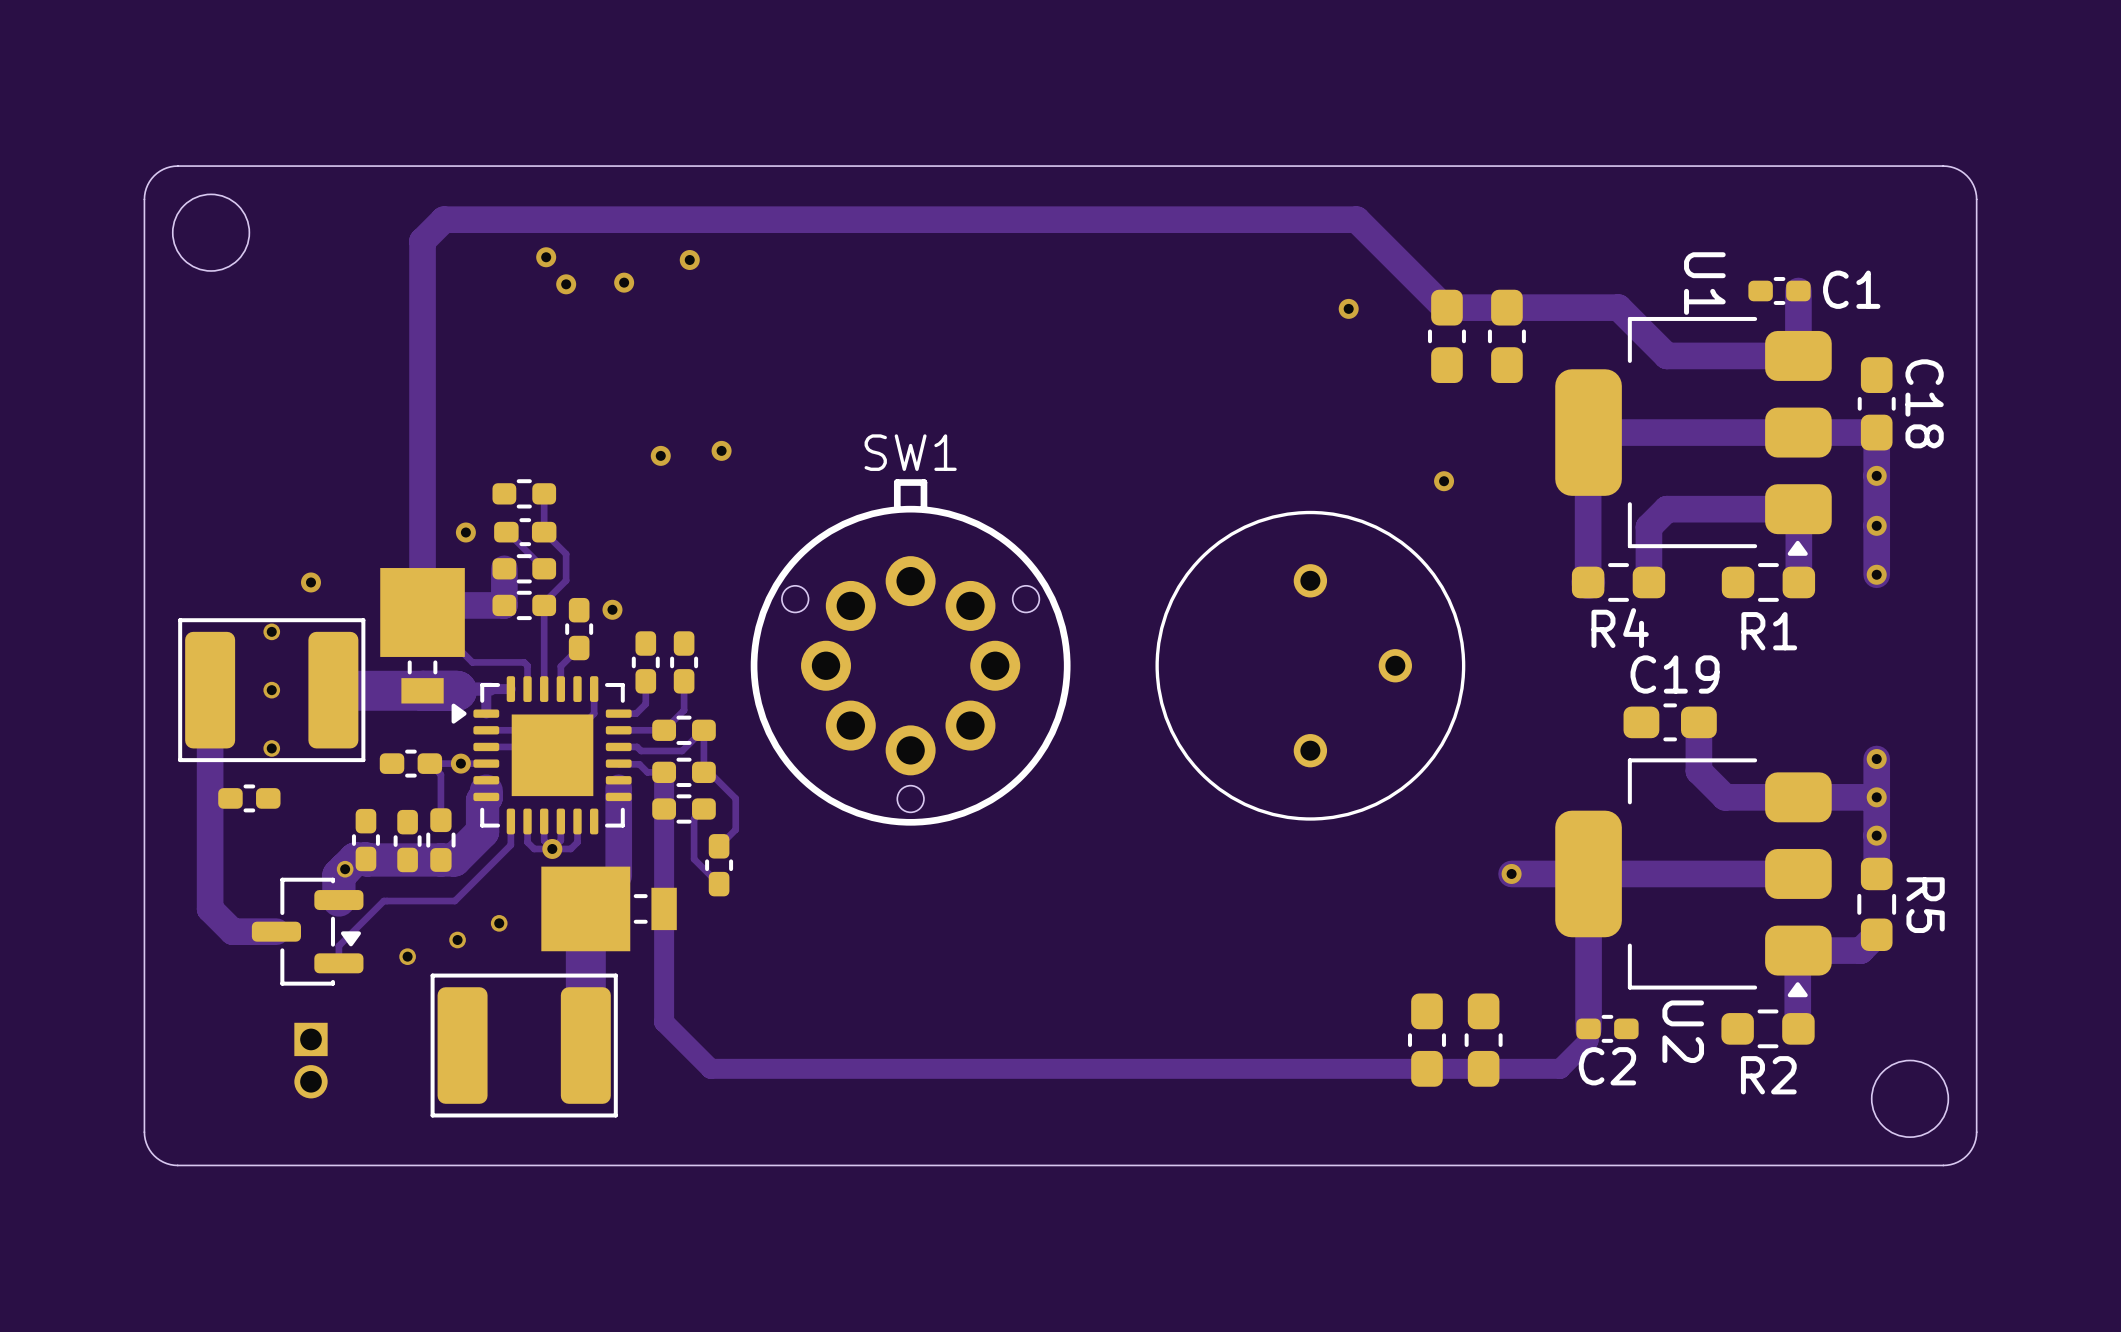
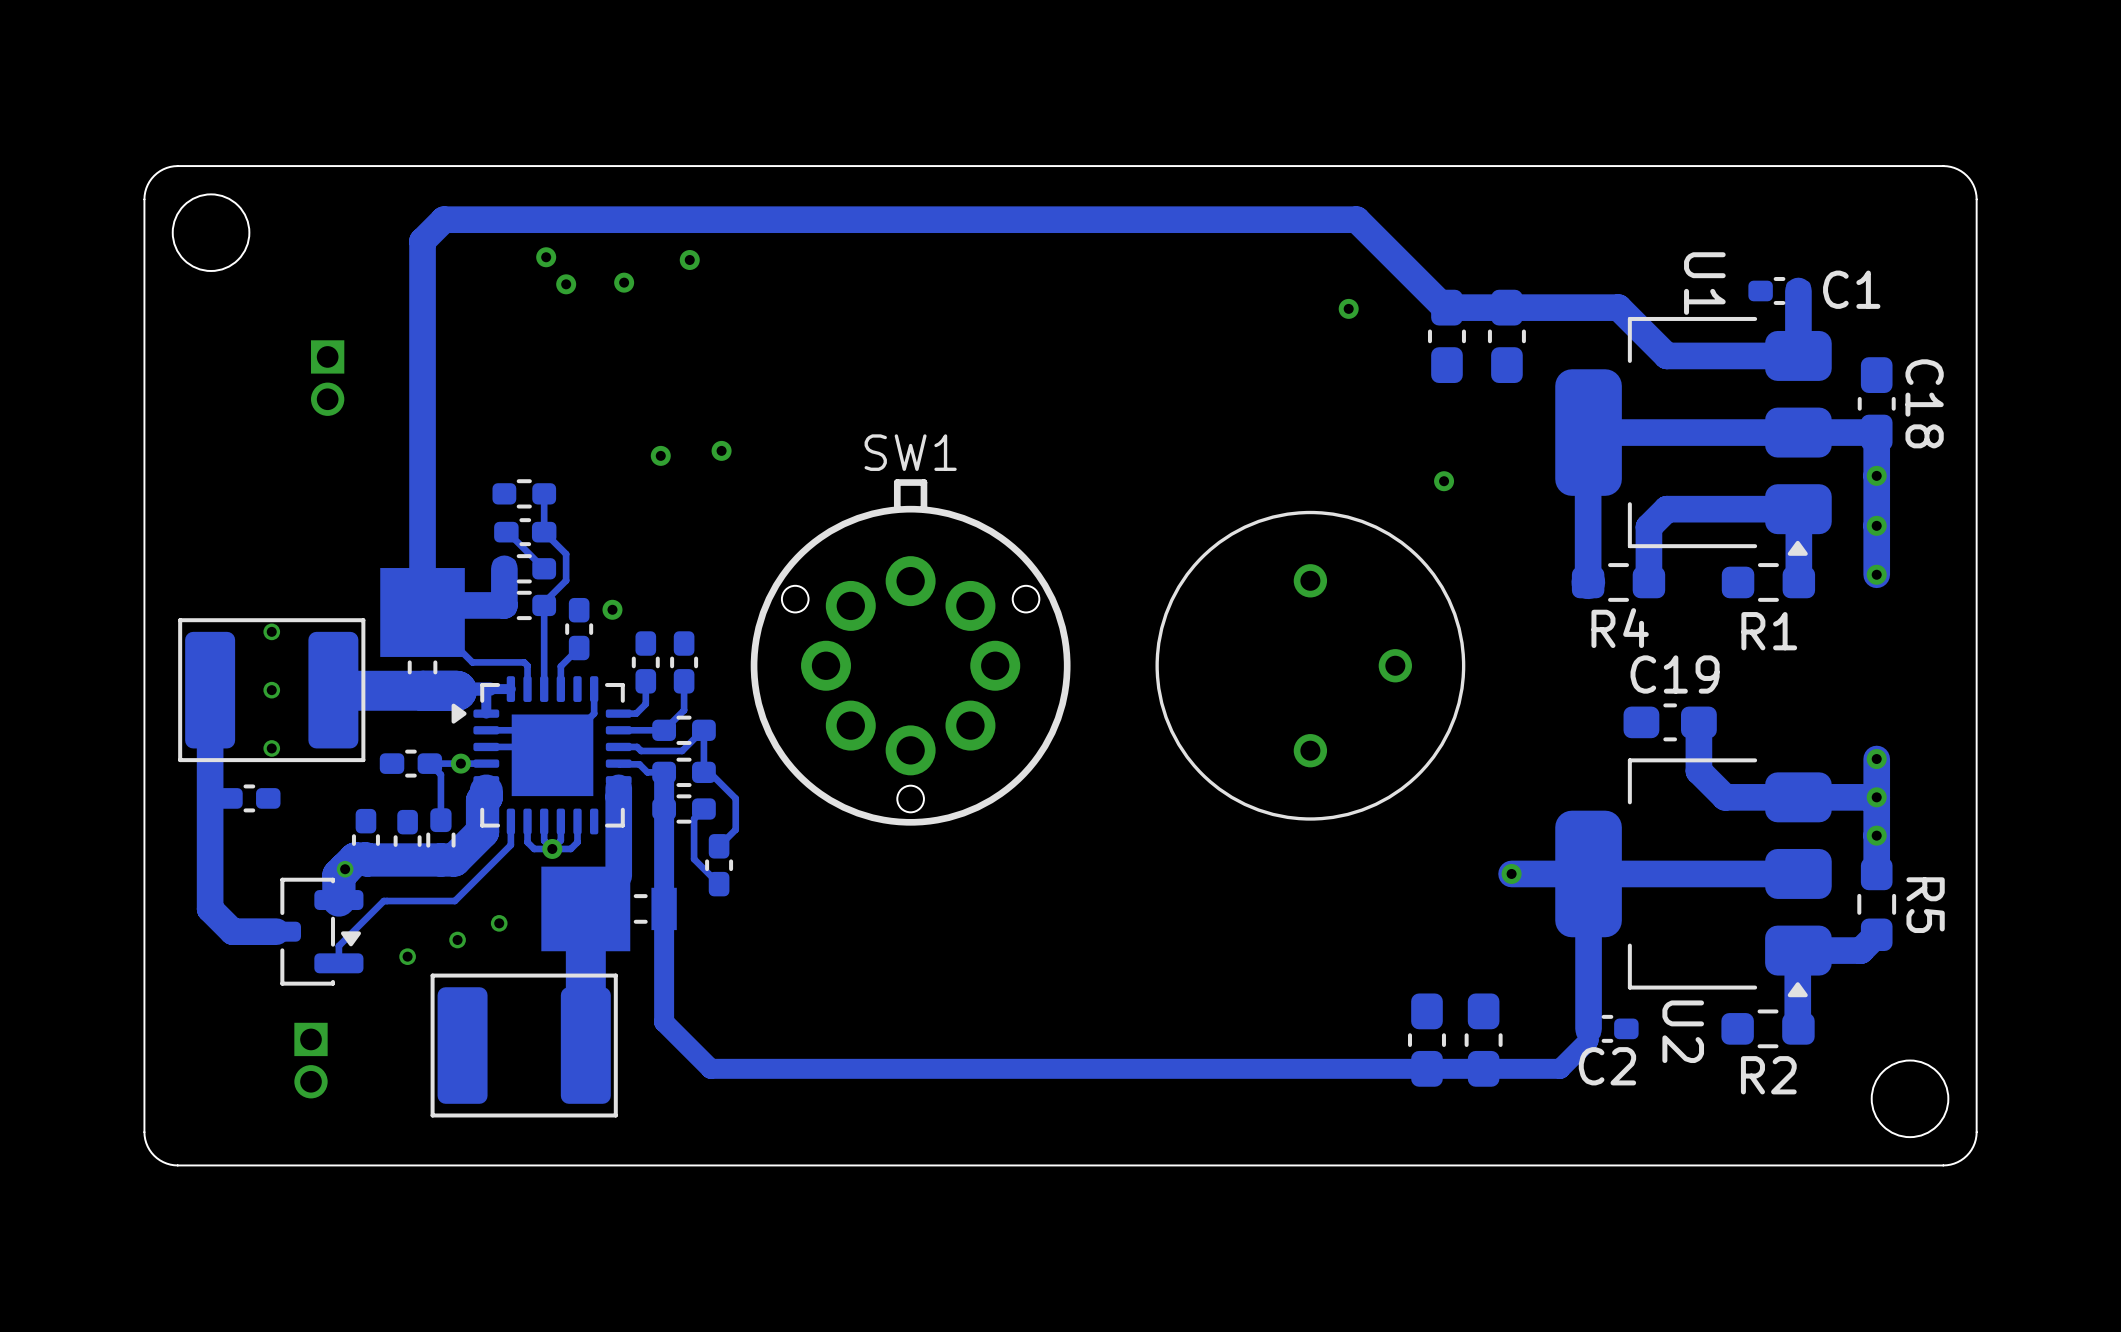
part: none -> (327, 378)
via: (465, 532) -> none
via: (310, 582) -> none

